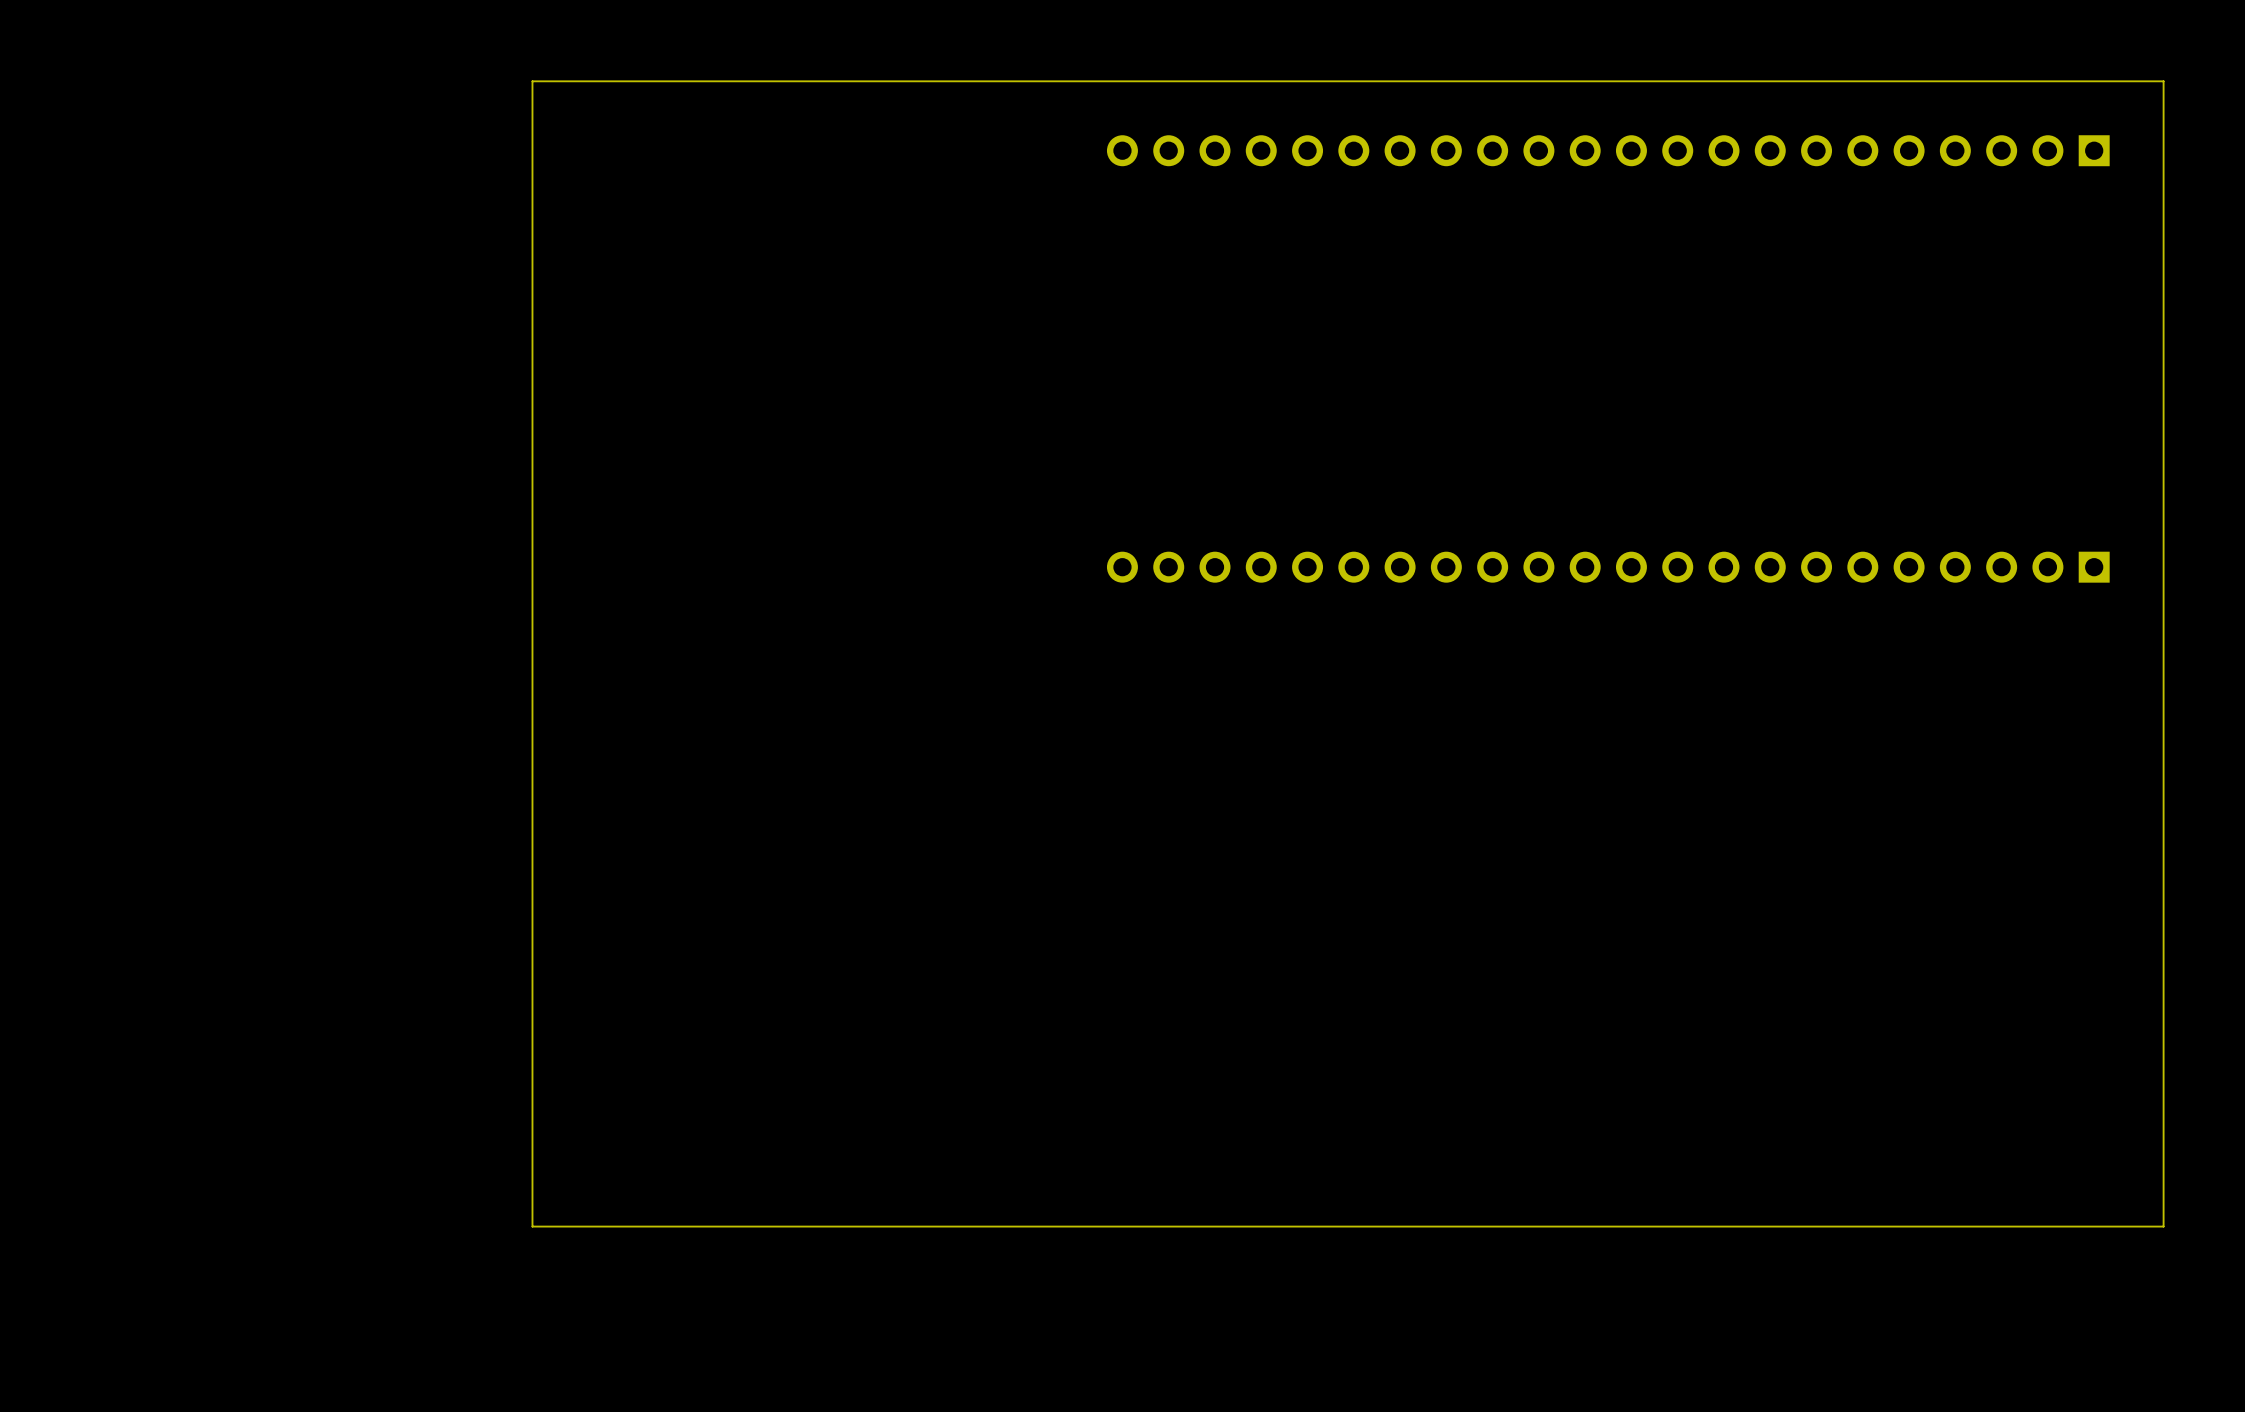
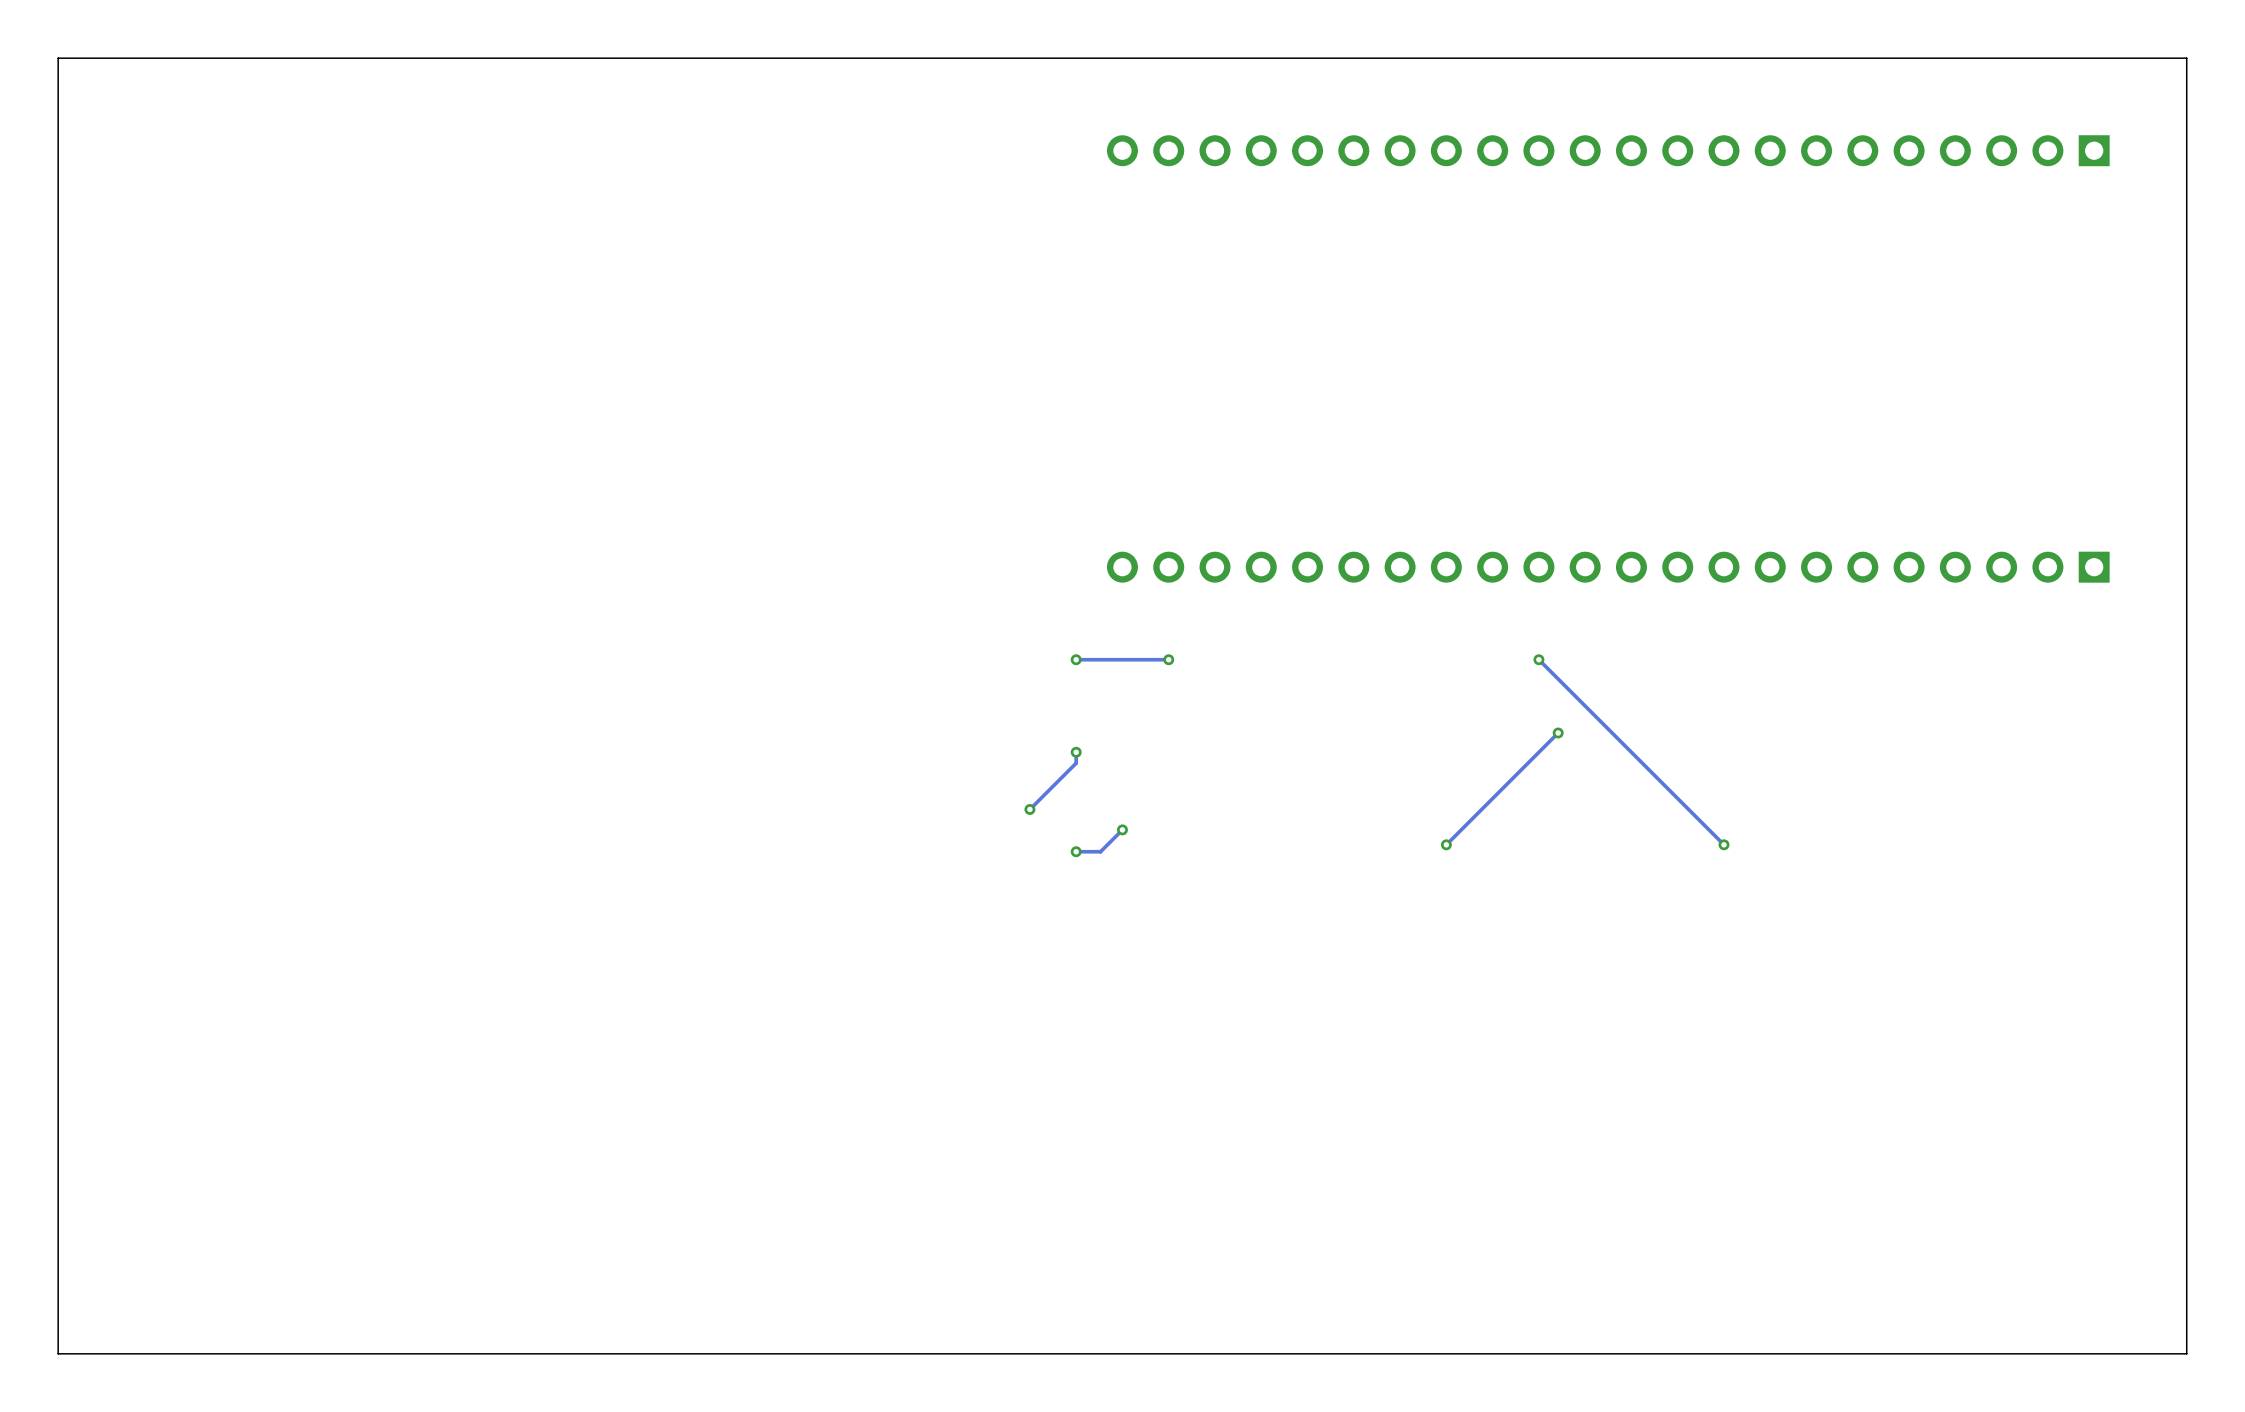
board edge: (2163, 81) (532, 81) (532, 1226) (2163, 1226) (2163, 81) -> (2186, 58) (2186, 1353) (58, 1353) (58, 58) (2186, 58)
via: none -> (1076, 659)
track: none -> (1168, 659) (1076, 659)
via: none -> (1168, 659)
track: none -> (1538, 659) (1724, 844)
via: none -> (1538, 659)
track: none -> (1558, 733) (1446, 844)
via: none -> (1558, 733)
track: none -> (1076, 752) (1076, 763) (1029, 809)
via: none -> (1076, 752)
via: none -> (1029, 809)
track: none -> (1122, 829) (1100, 851) (1076, 851)
via: none -> (1122, 829)
via: none -> (1446, 844)
via: none -> (1724, 844)
via: none -> (1076, 851)

